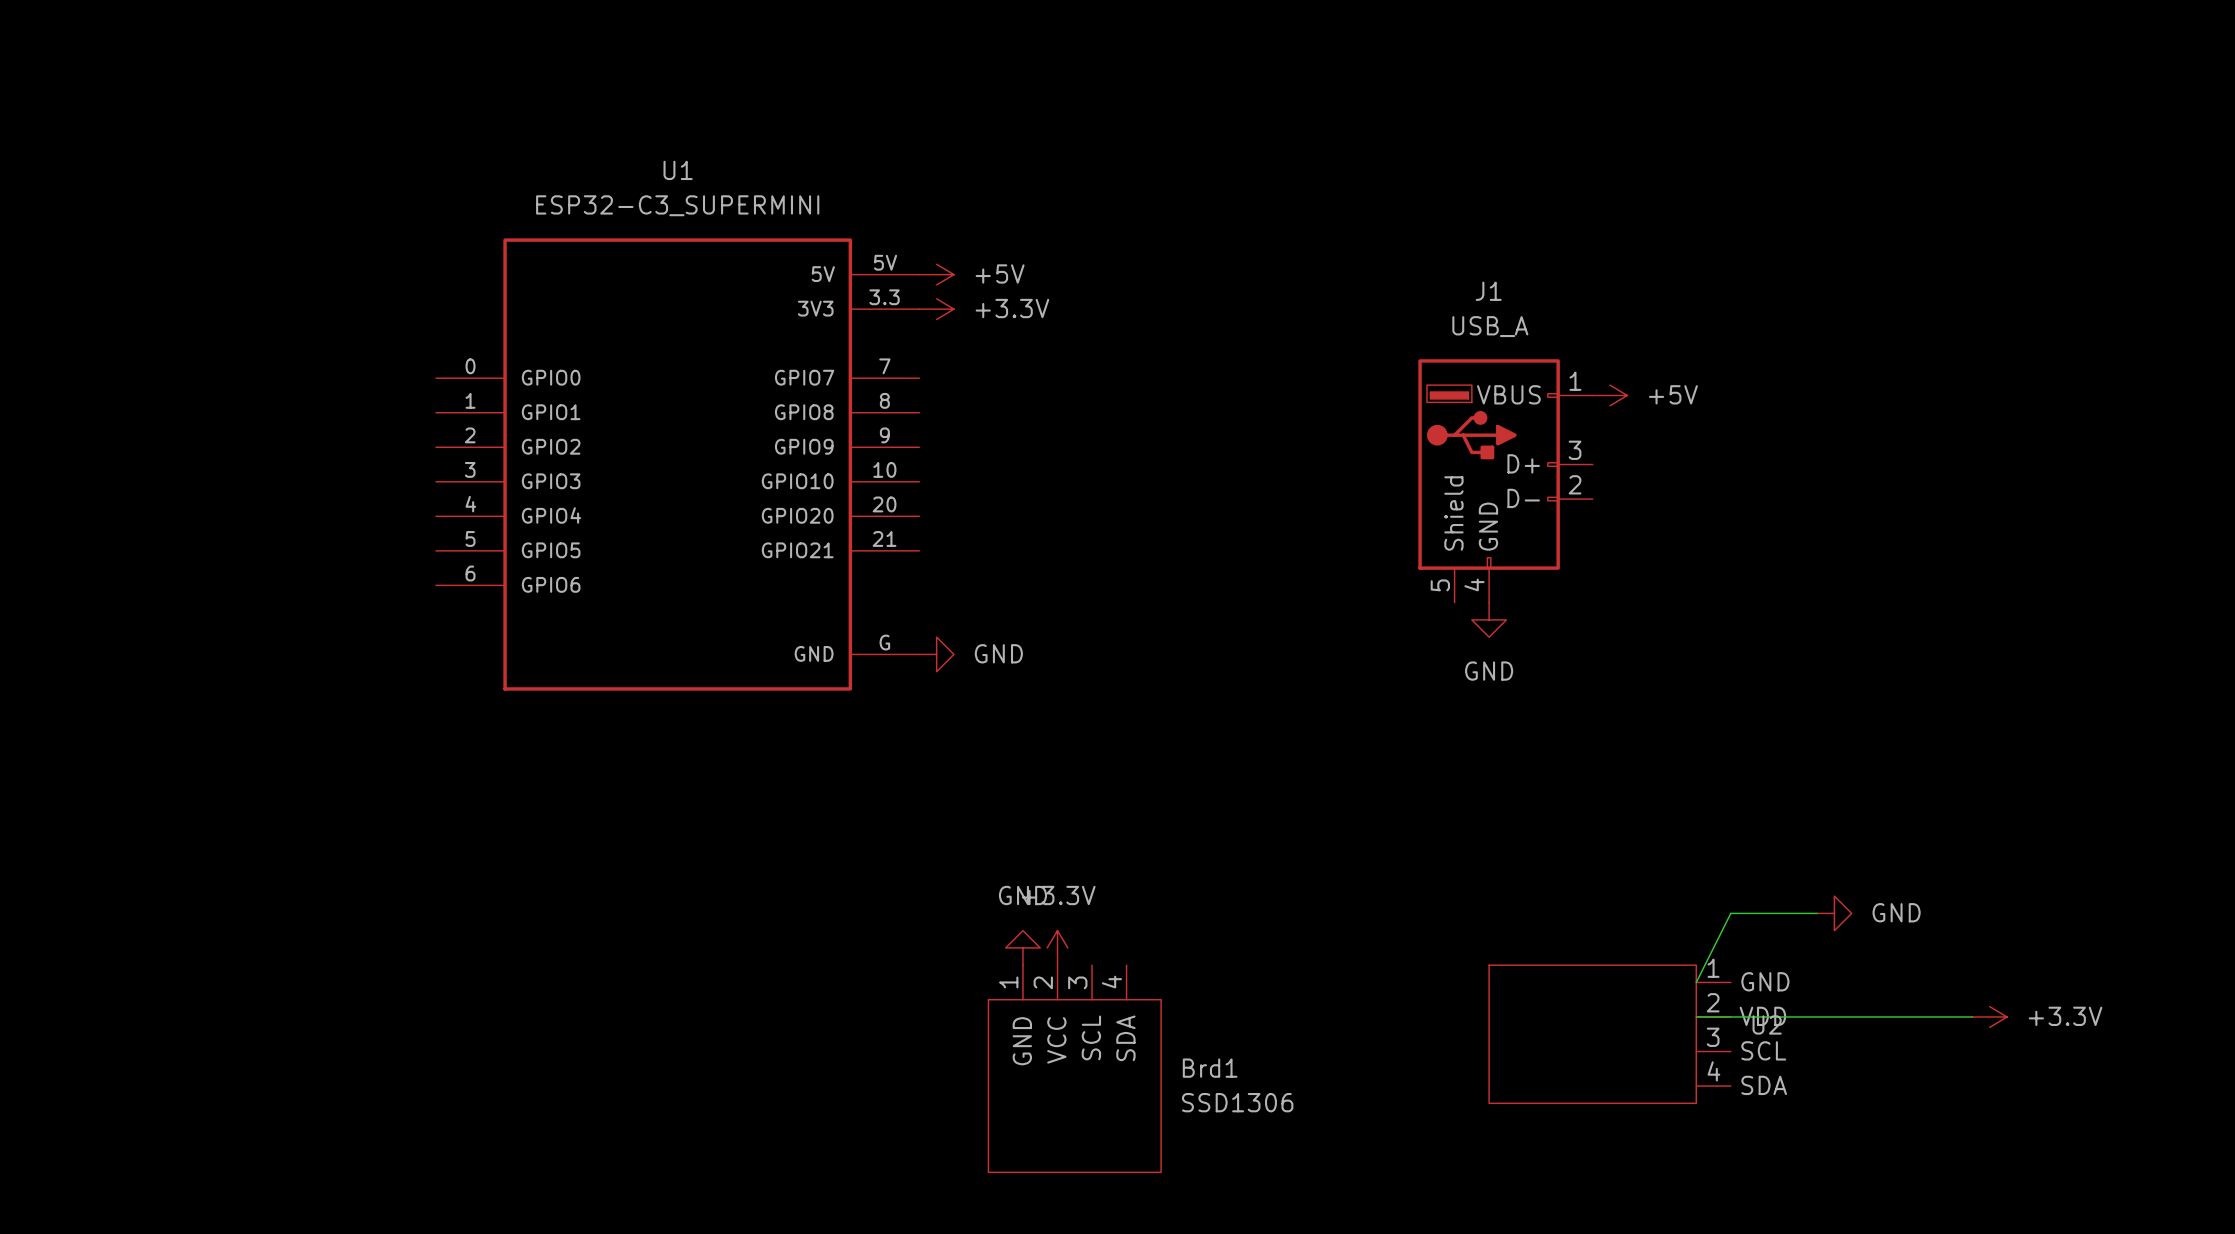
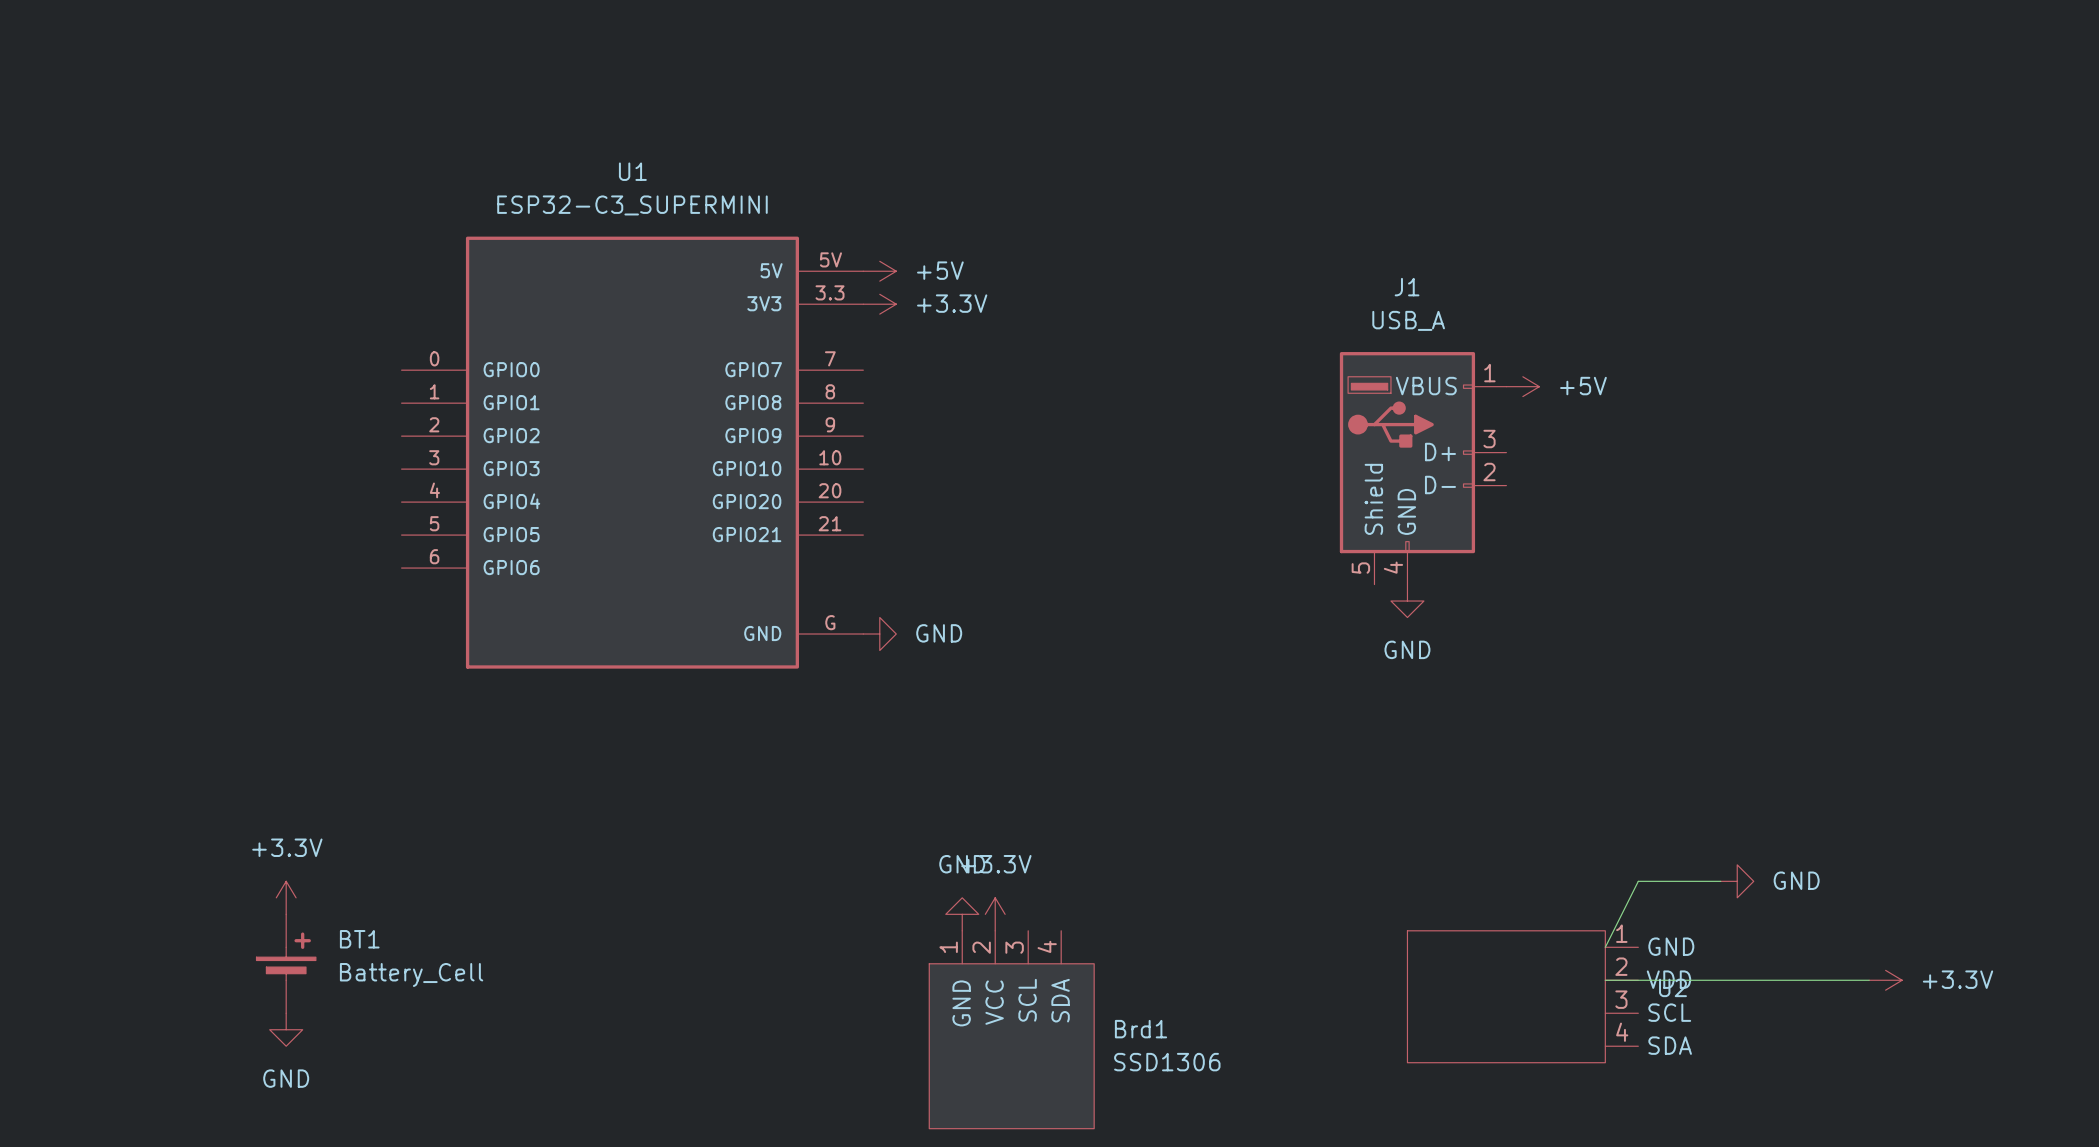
power symbol: none -> +3.3V (286, 897)
BT1: none -> Battery_Cell (286, 963)
power symbol: none -> GND (286, 1029)

